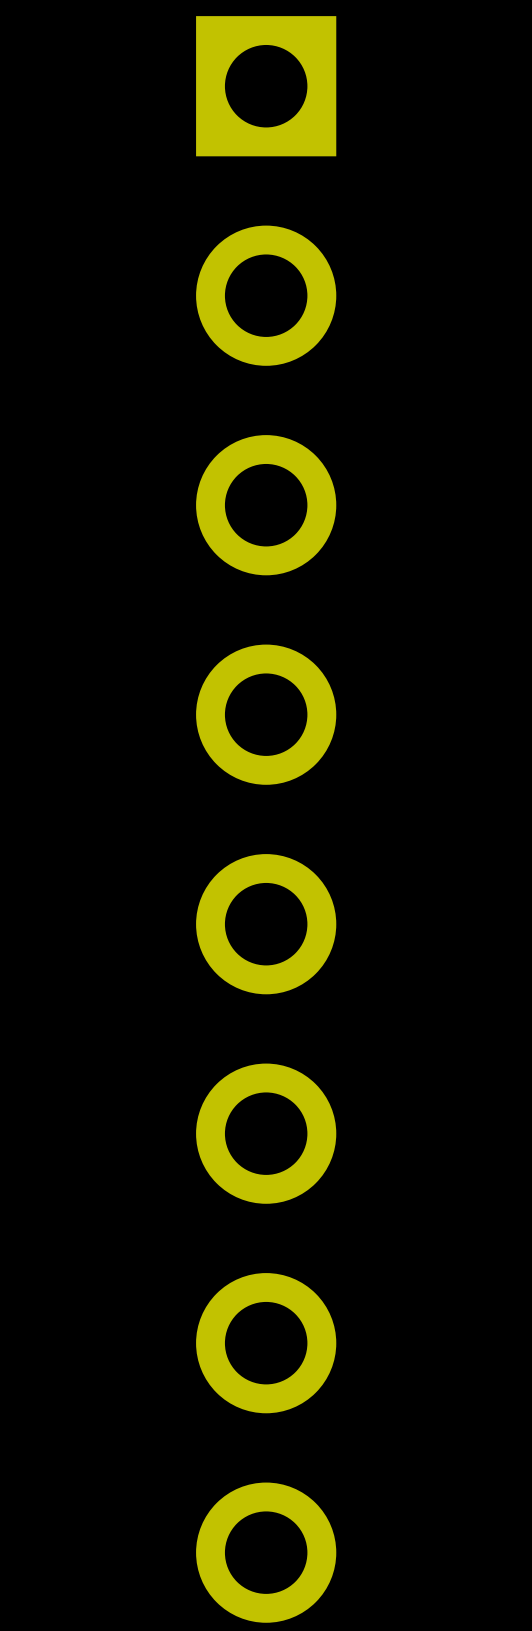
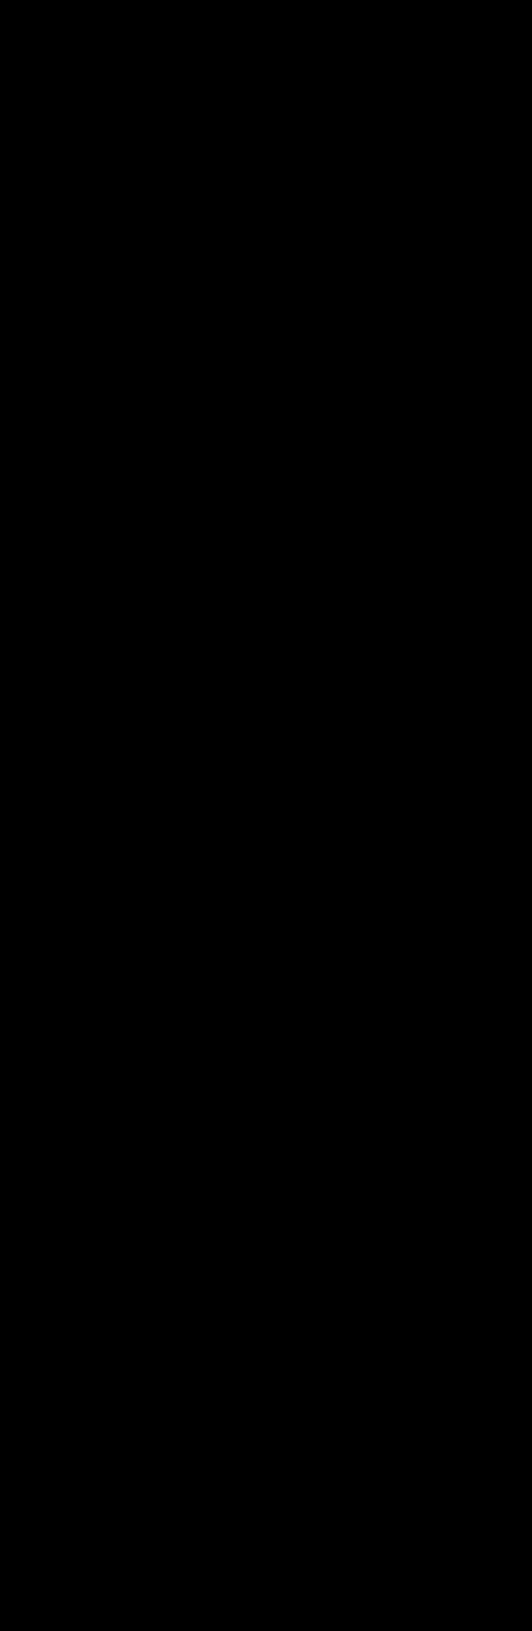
part: (266, 819) -> none

